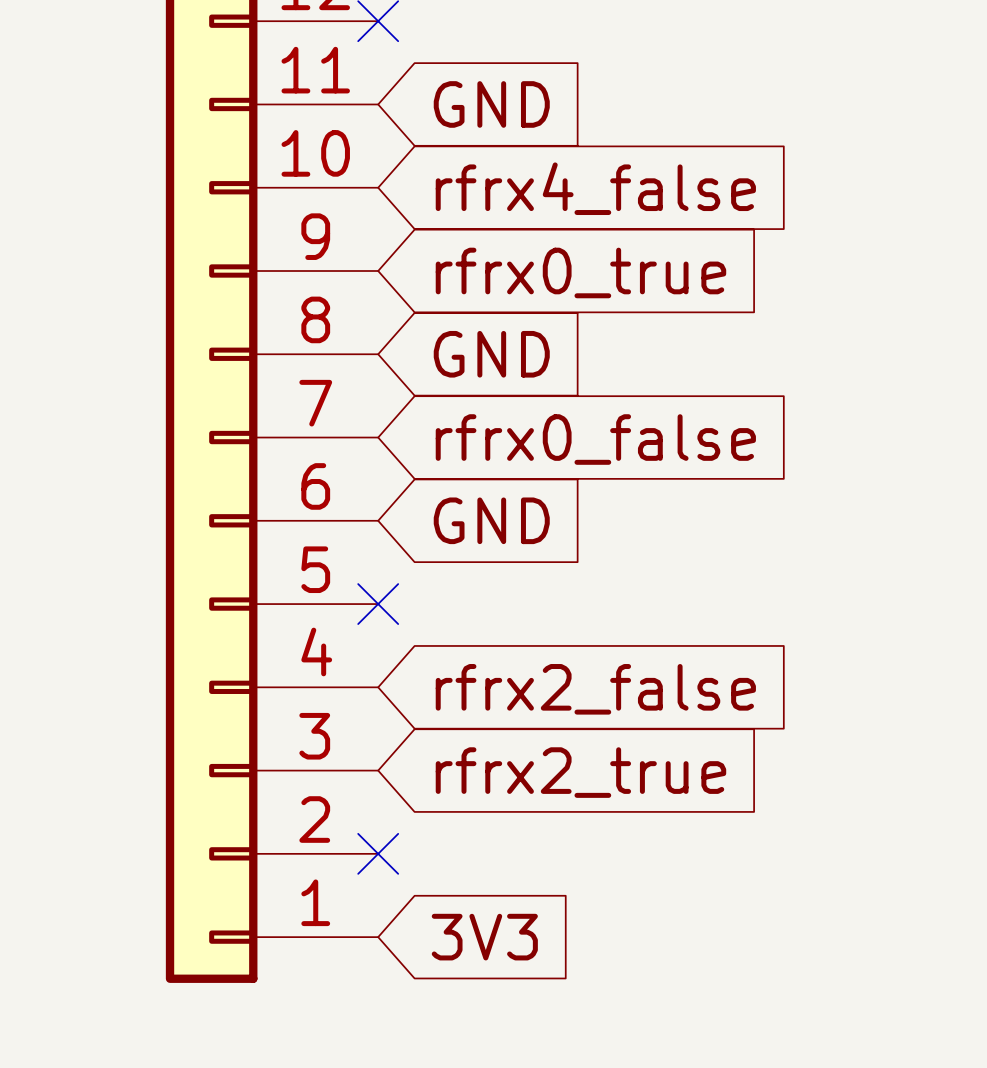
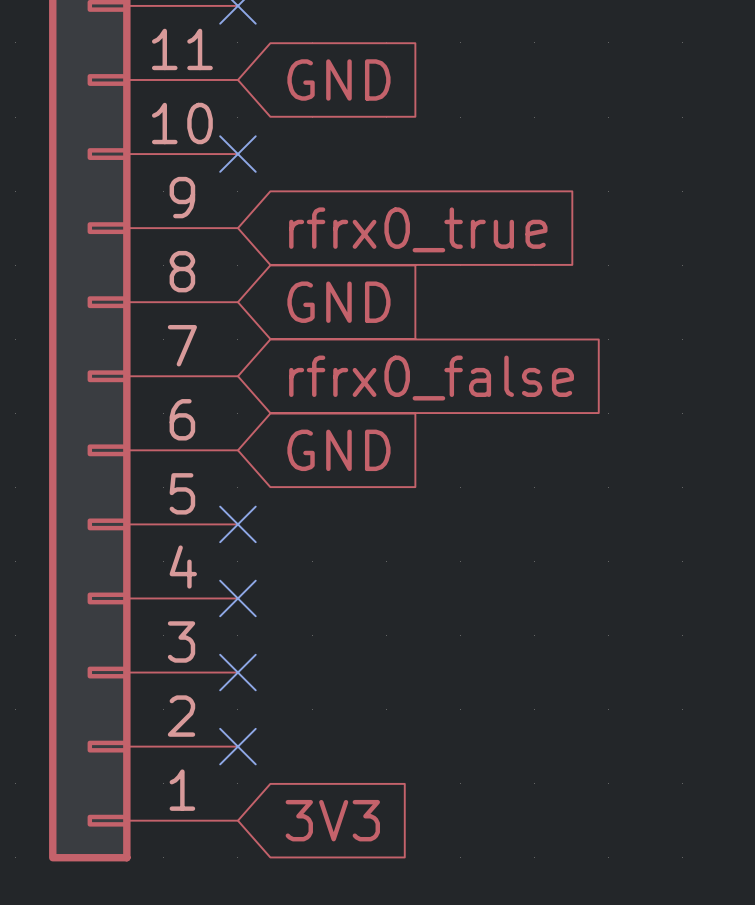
no-connect mark: none -> (237, 154)
global label: rfrx4_false (595, 188) -> none
no-connect mark: none -> (237, 598)
global label: rfrx2_false (595, 689) -> none
no-connect mark: none -> (237, 672)
global label: rfrx2_true (580, 772) -> none

